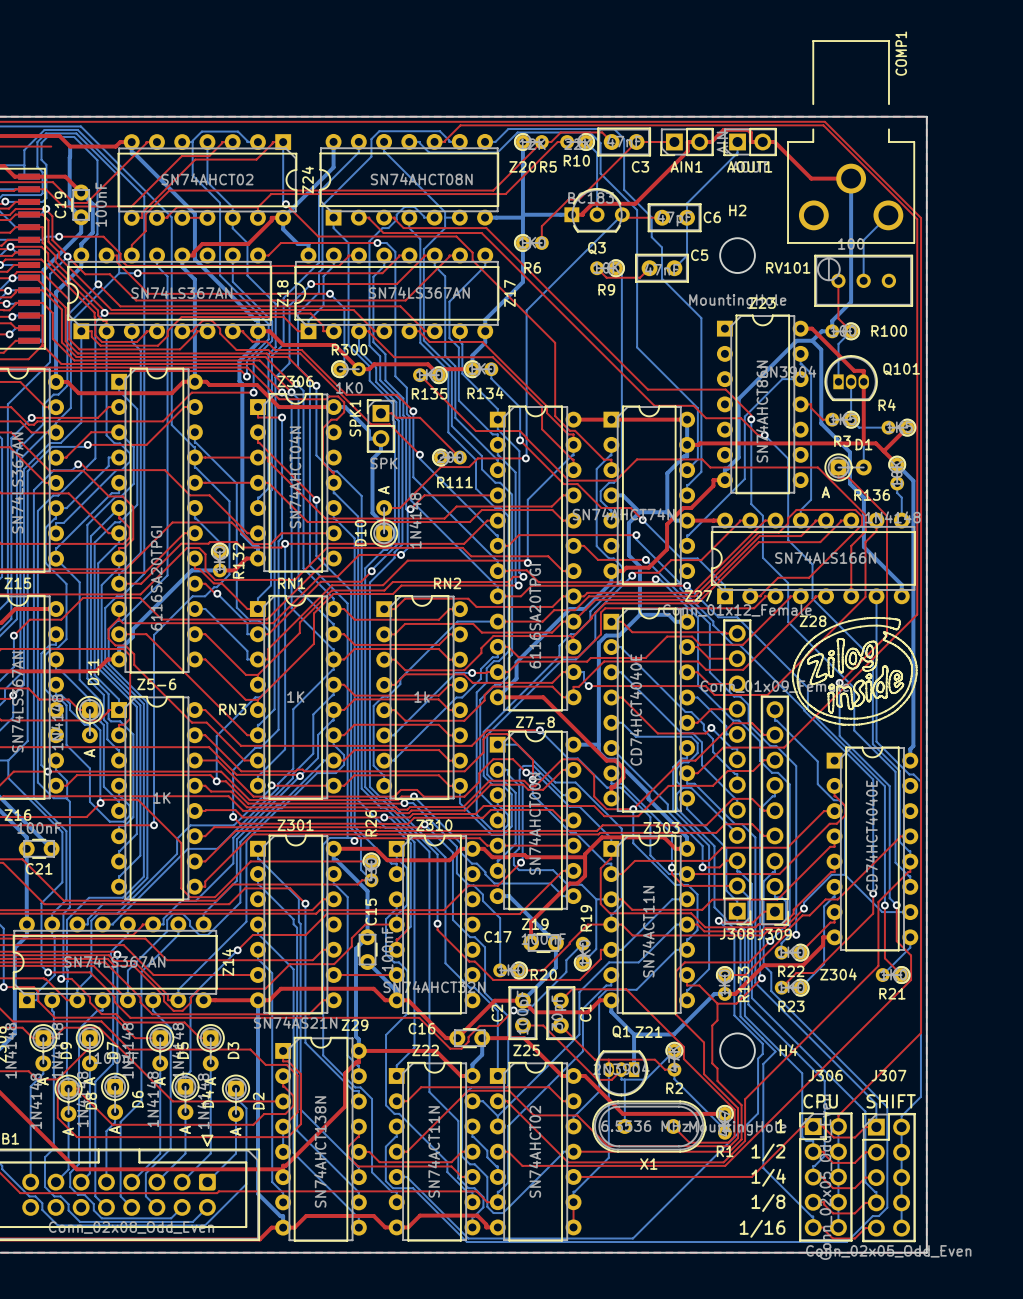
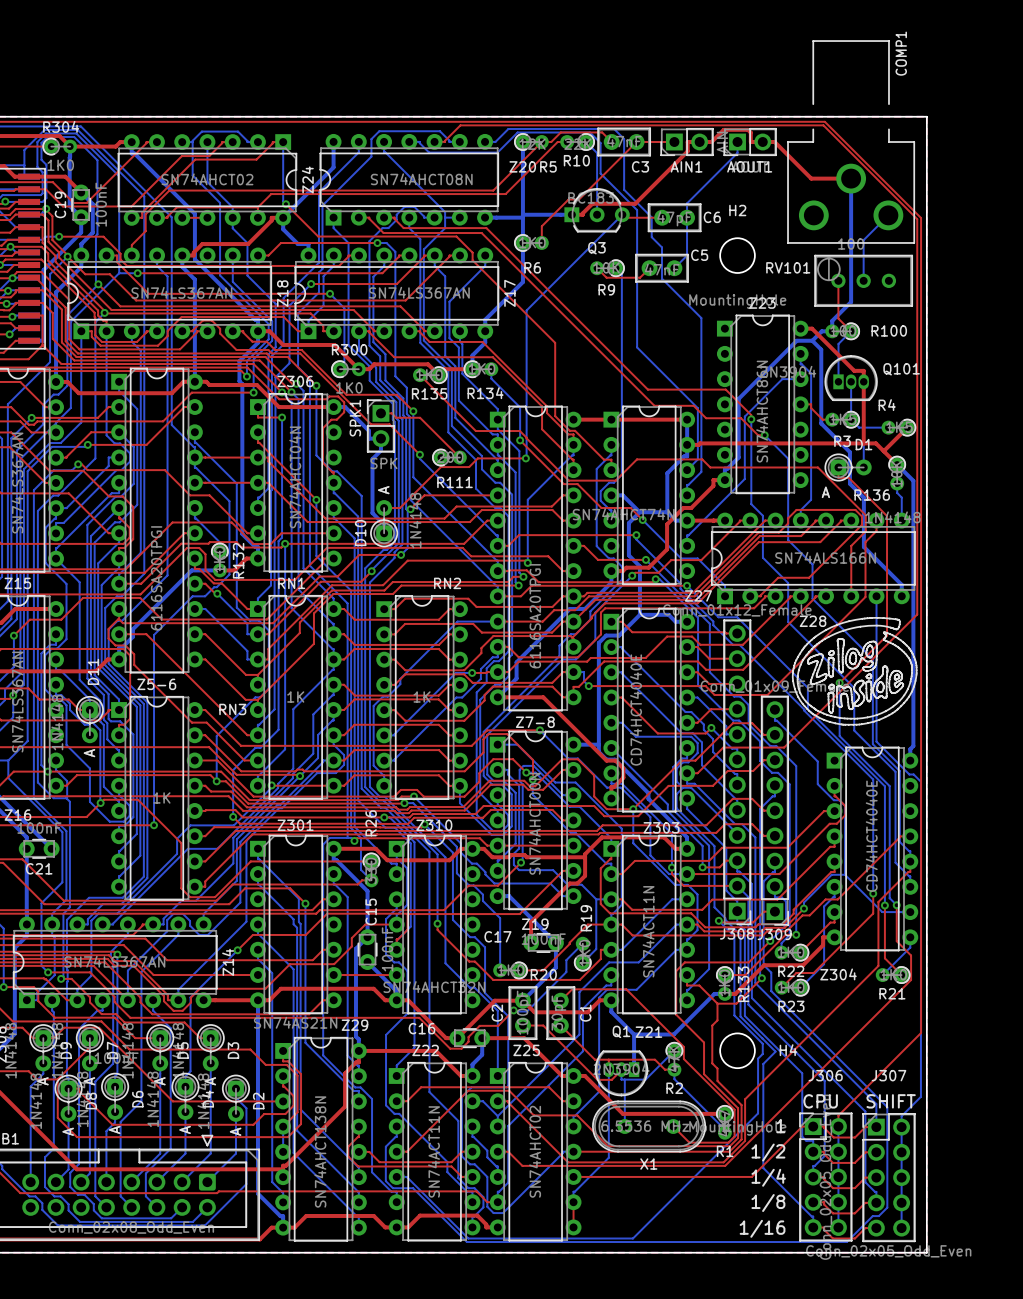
R304: none -> 1K0 (59, 146)
RN2 value: 1k (422, 696) -> 1K (422, 696)

